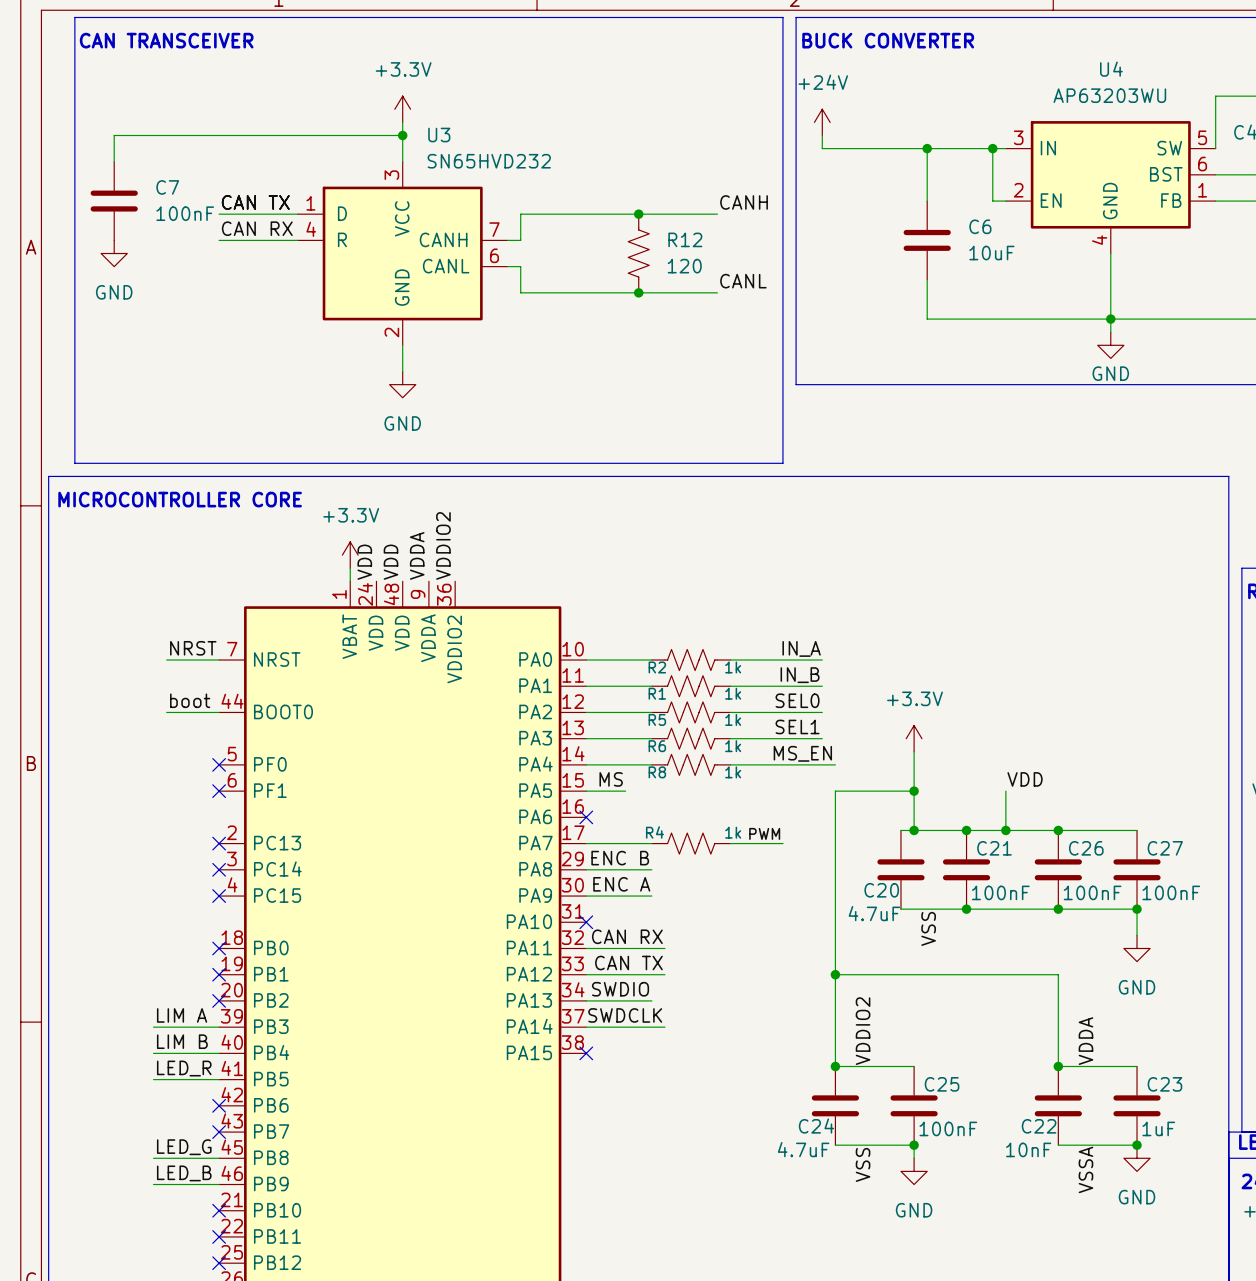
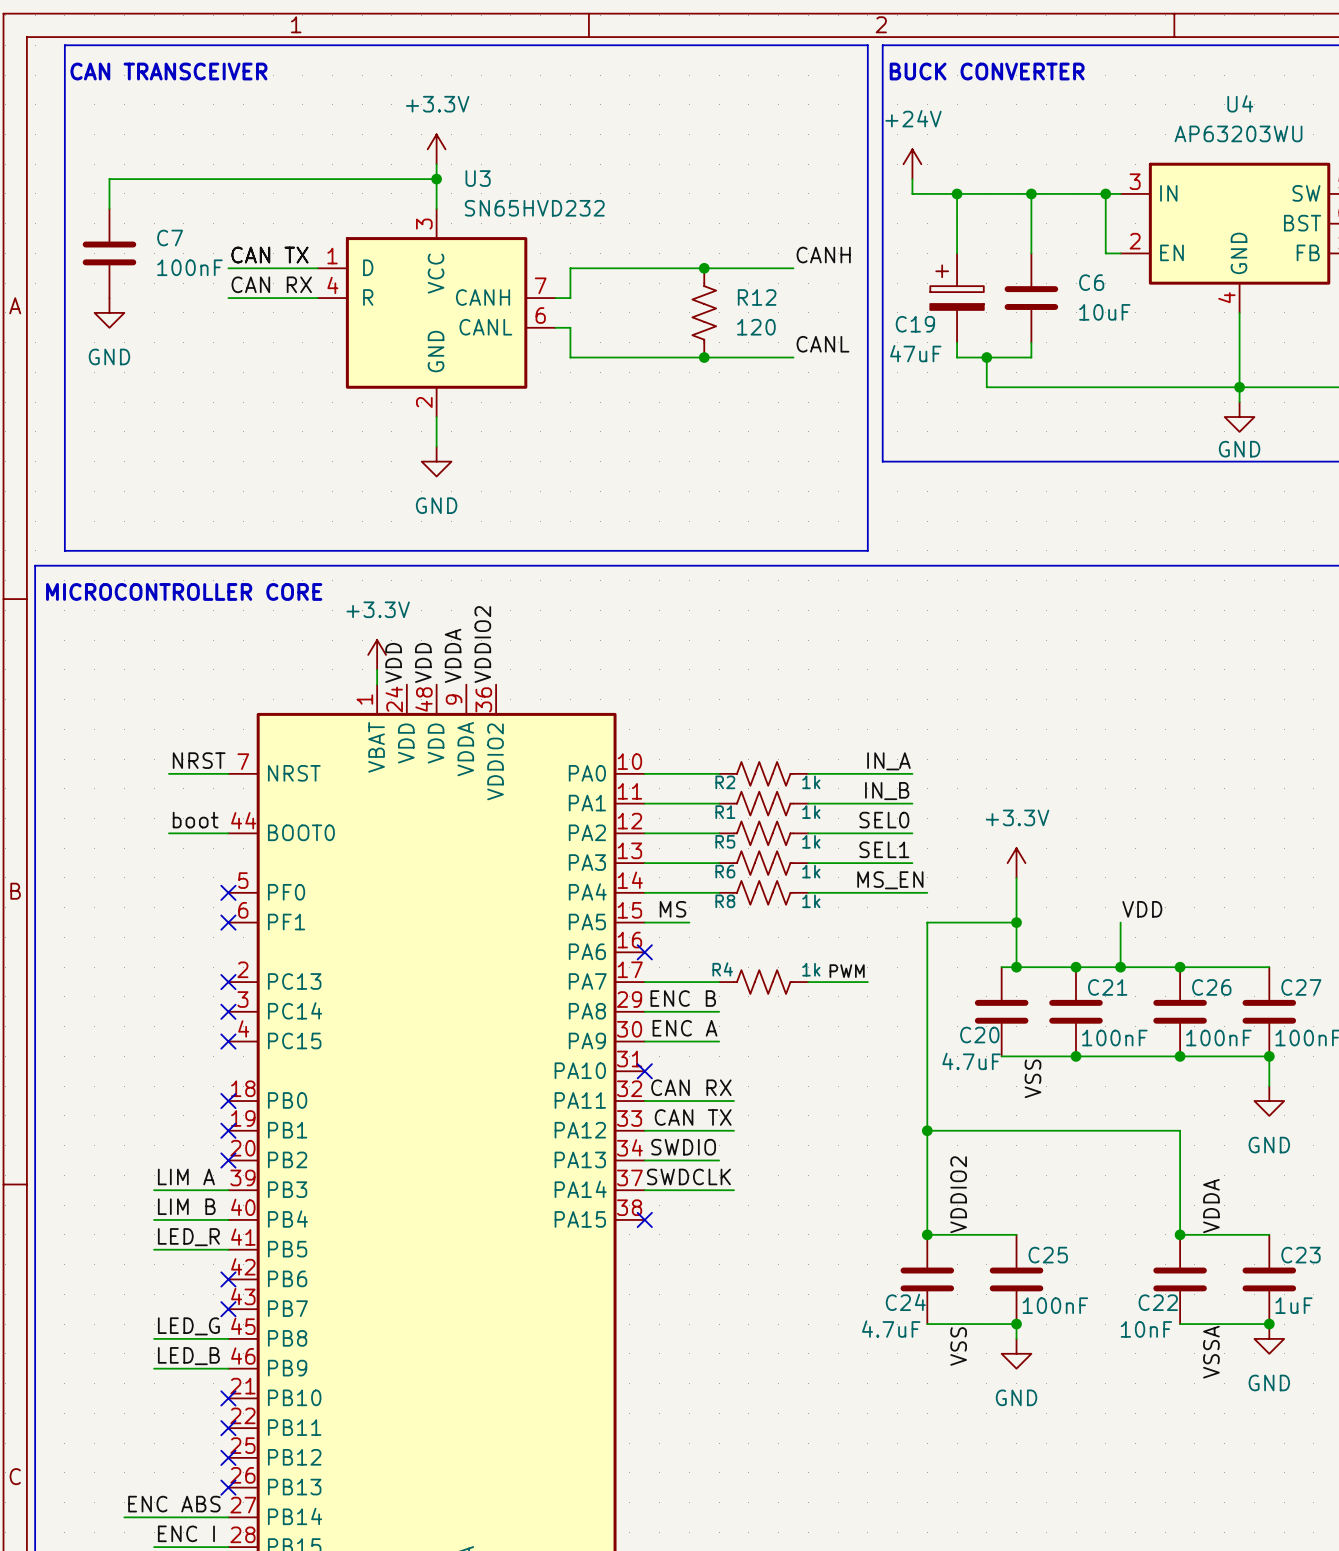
wire: none -> (957, 193) (957, 253)
junction: none -> (957, 193)
C19: none -> 47uF (957, 298)
wire: none -> (957, 342) (957, 357) (1031, 357)
junction: none -> (986, 357)
wire: (927, 292) (927, 319) -> (986, 357) (986, 387) (1031, 387)

